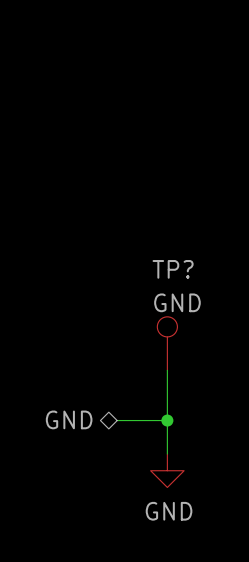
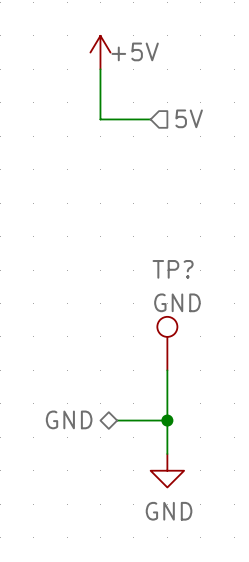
power symbol: none -> +5V (100, 52)
wire: none -> (100, 69) (100, 119) (150, 119)
hierarchical label: none -> 5V (189, 118)

